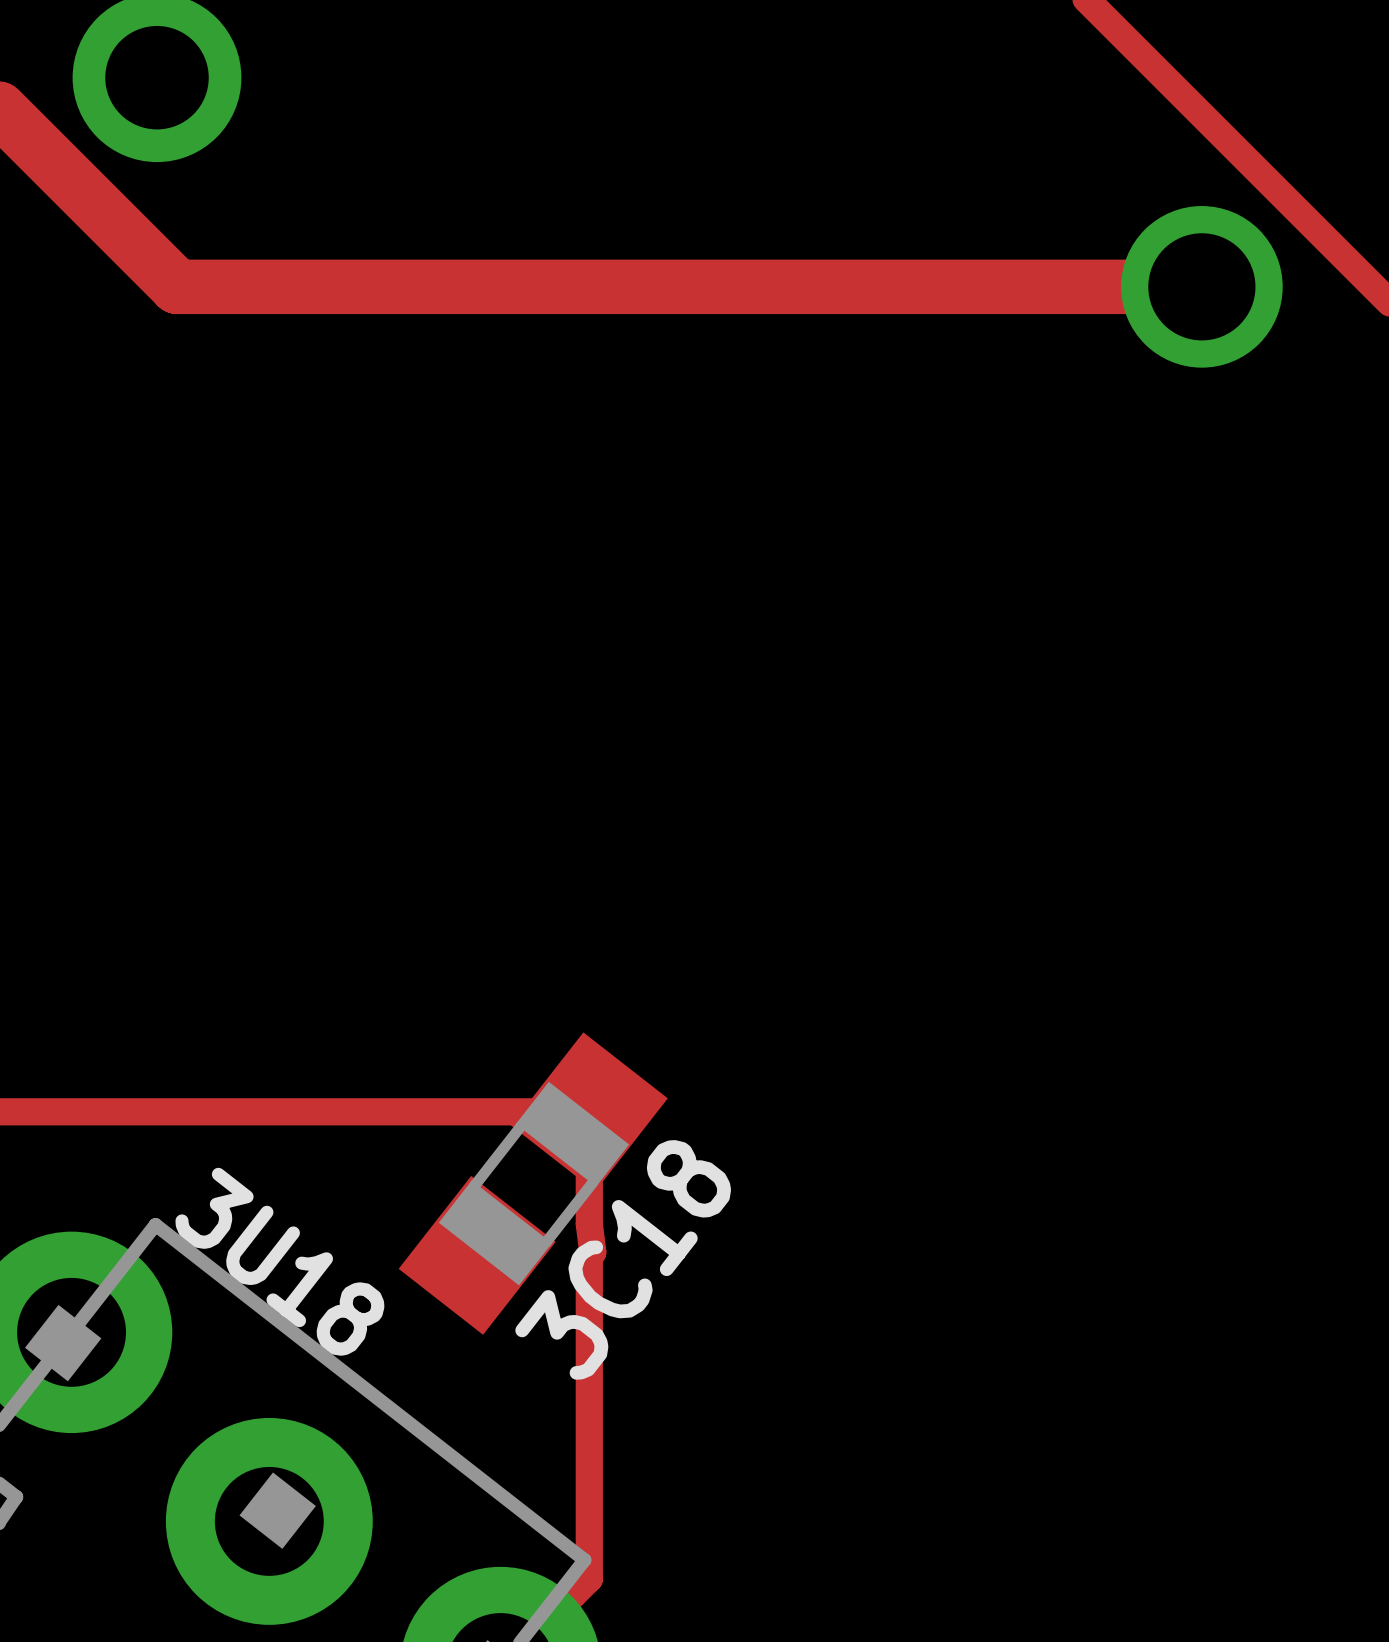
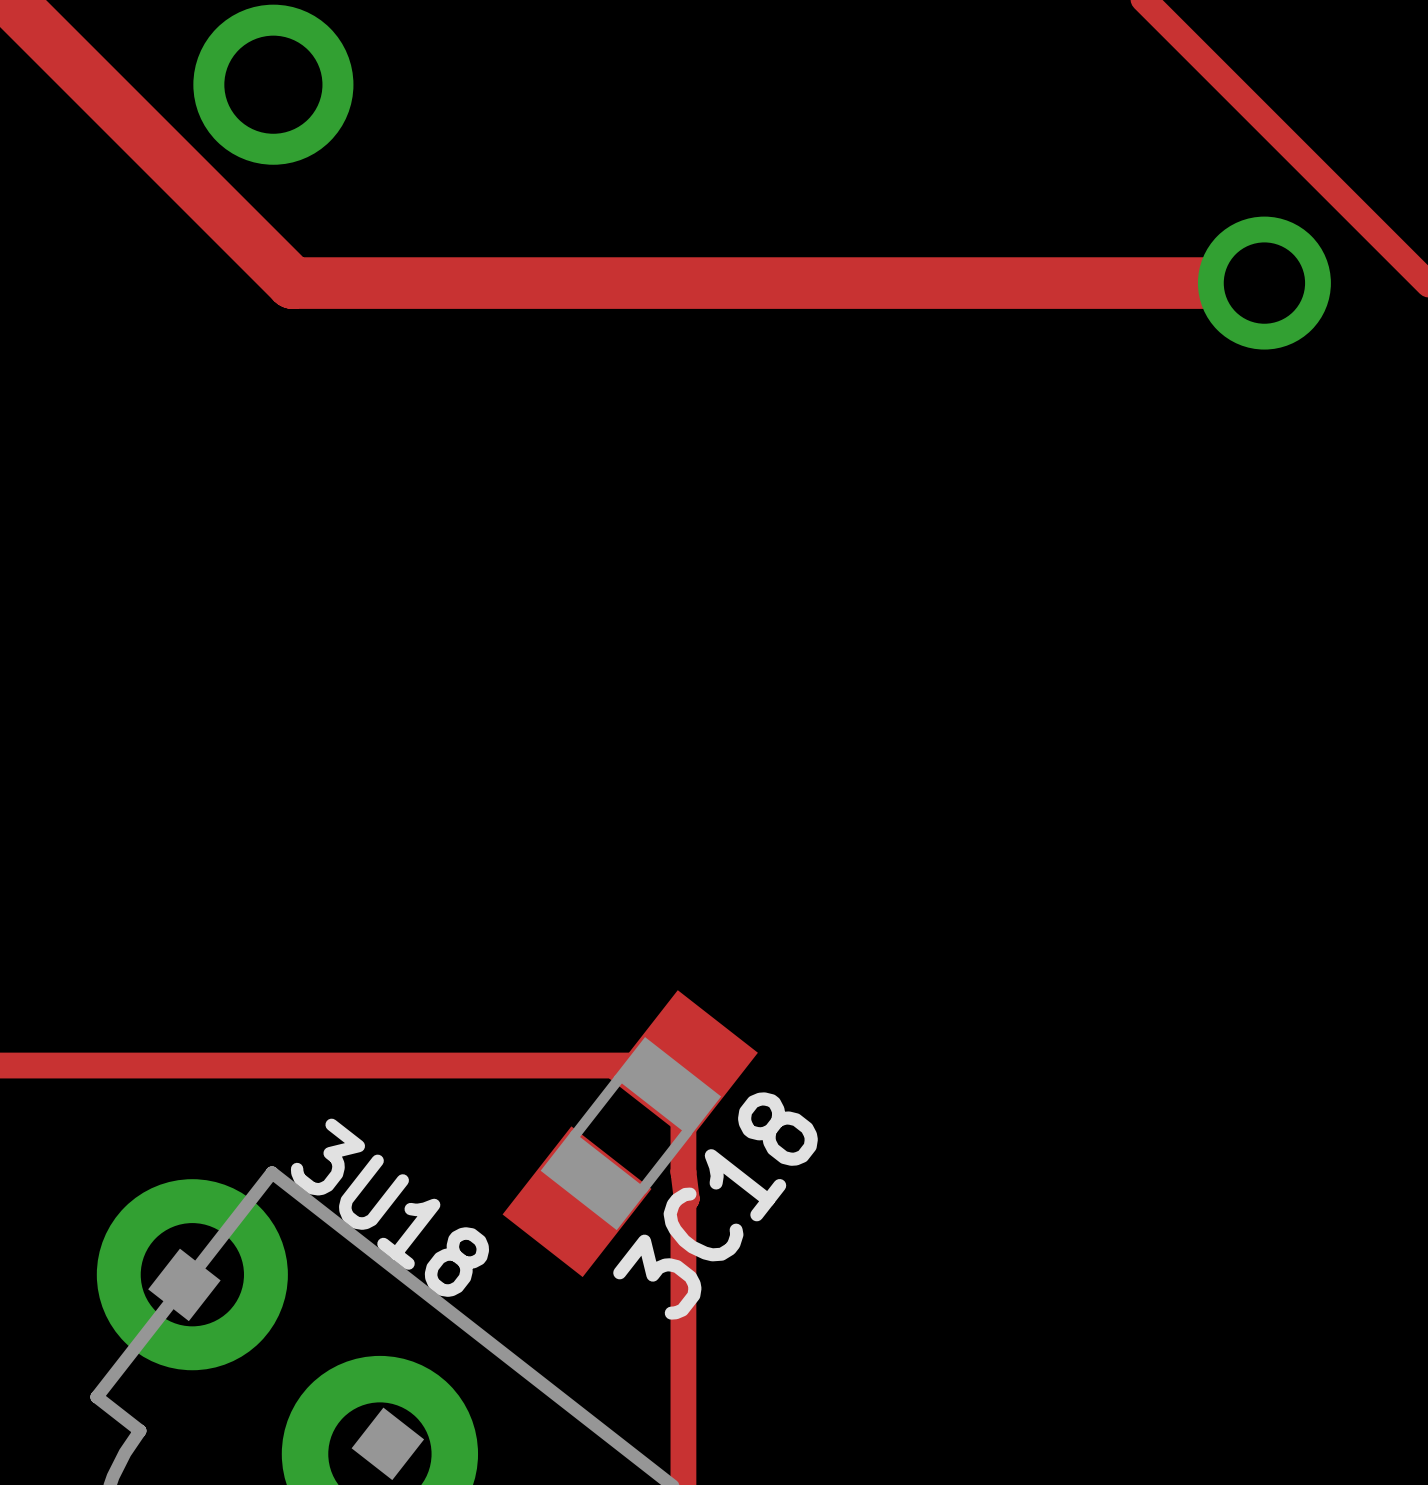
via size: [1121, 206, 1283, 368] -> [1197, 216, 1331, 350]

